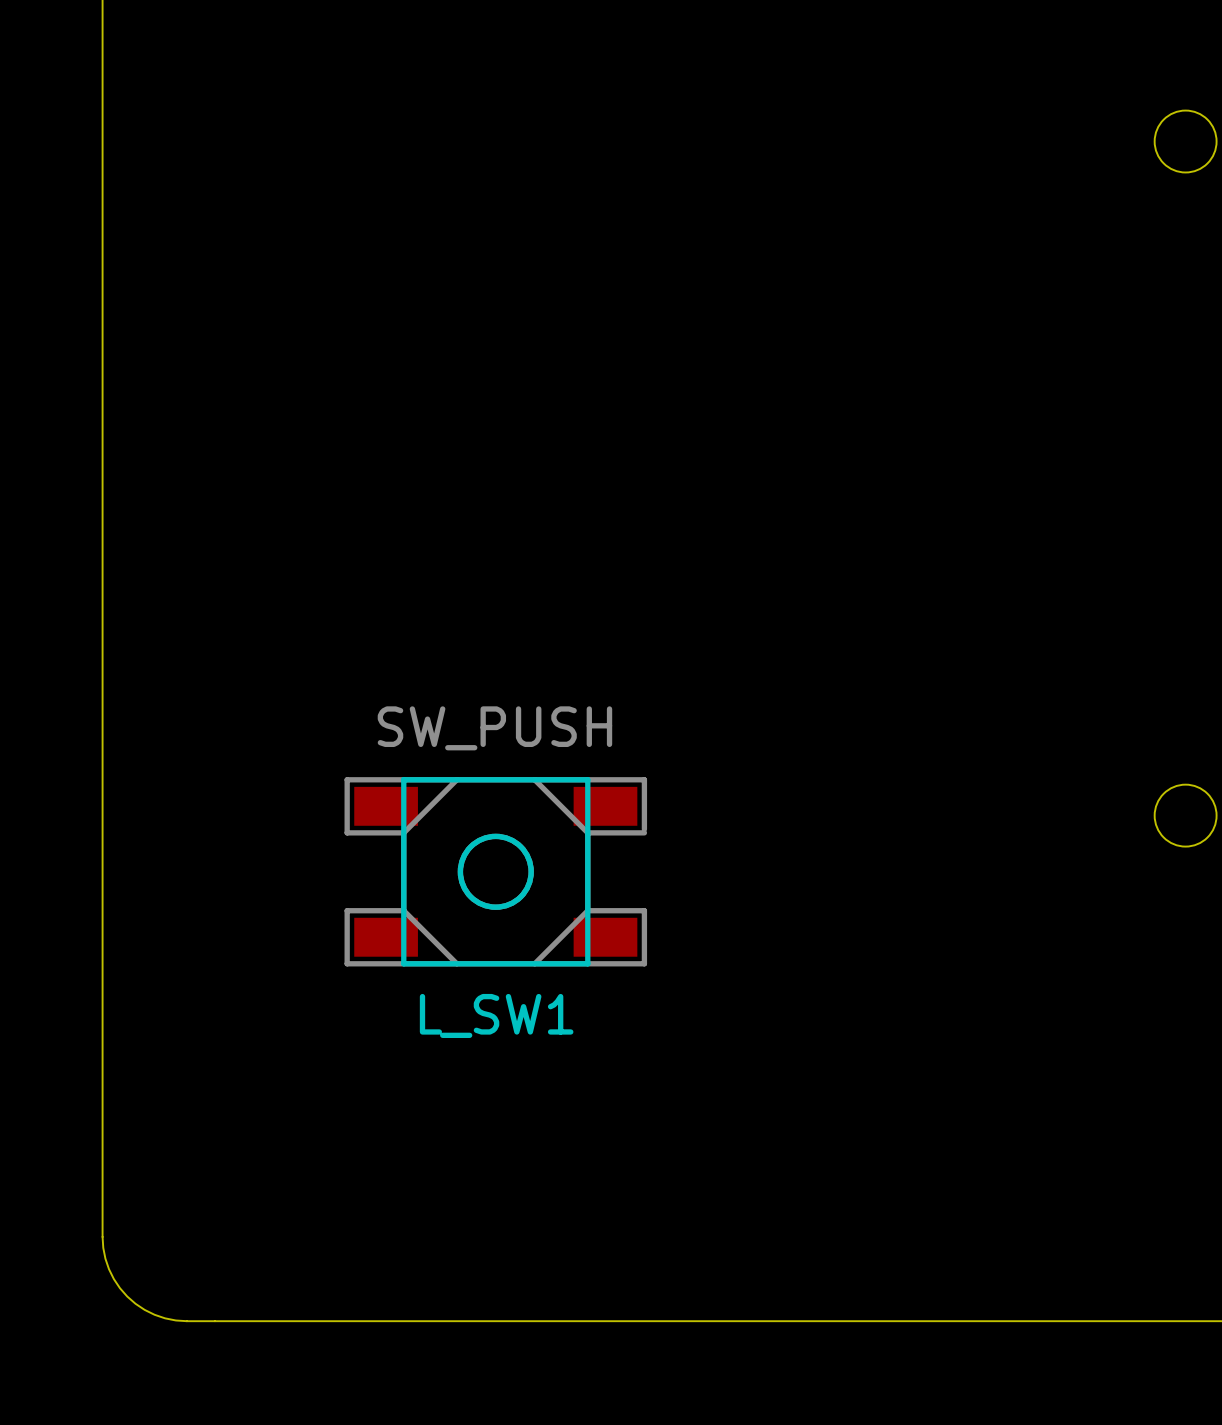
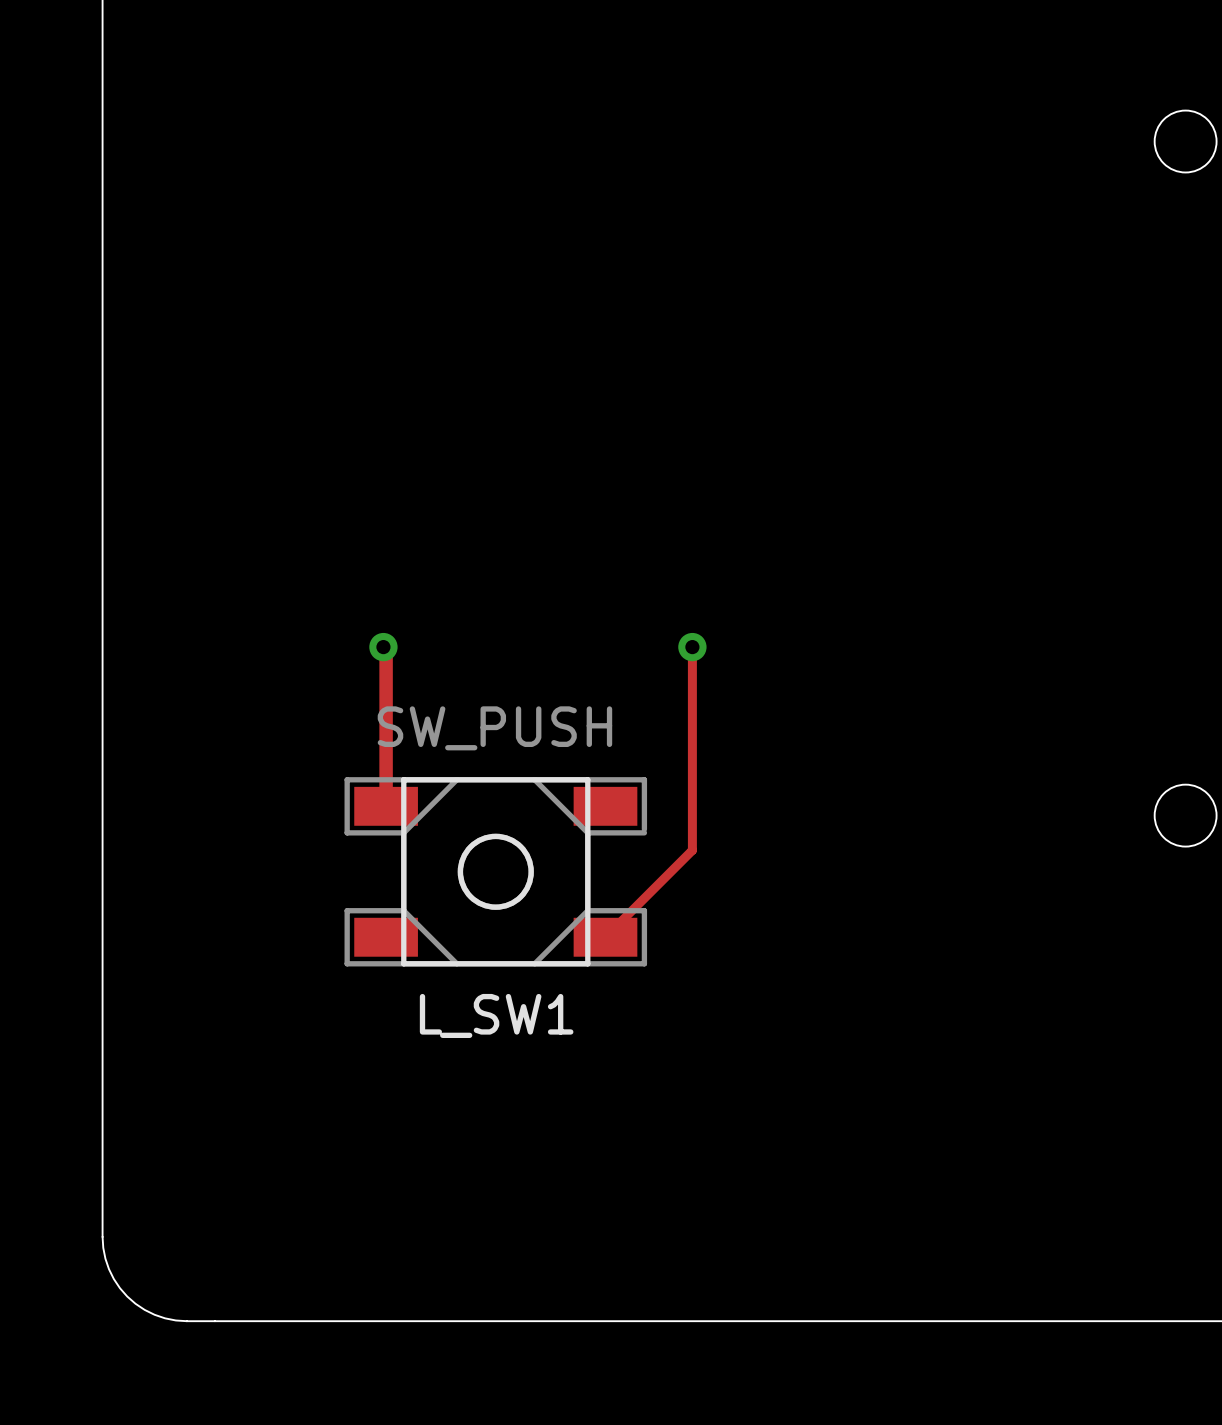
track: none -> (383, 647) (386, 649) (386, 806)
via: none -> (383, 647)
track: none -> (692, 647) (692, 850) (605, 937)
via: none -> (692, 647)

